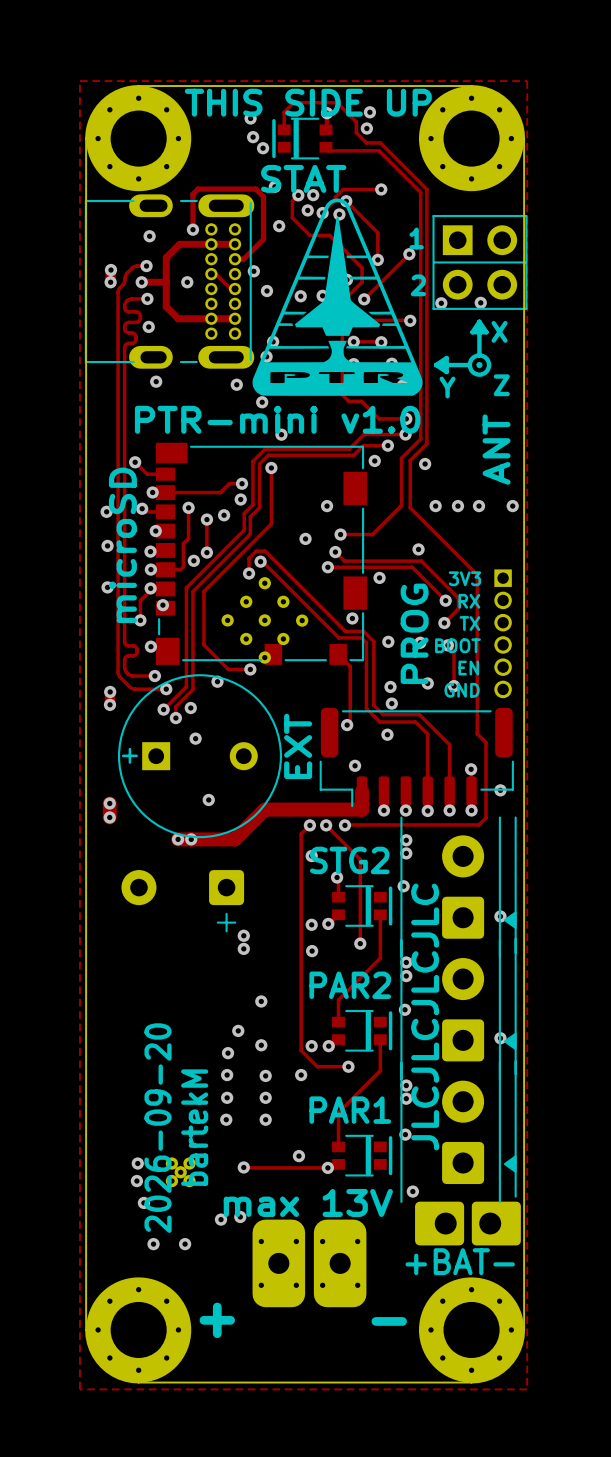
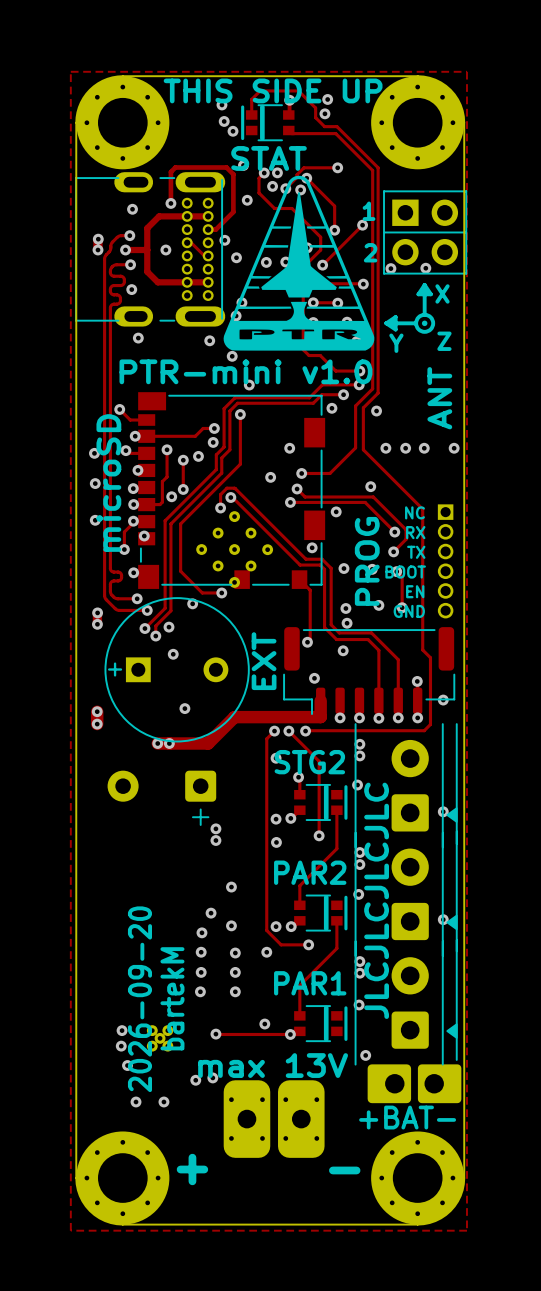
text: 3V3 (464, 578) -> NC (414, 512)

